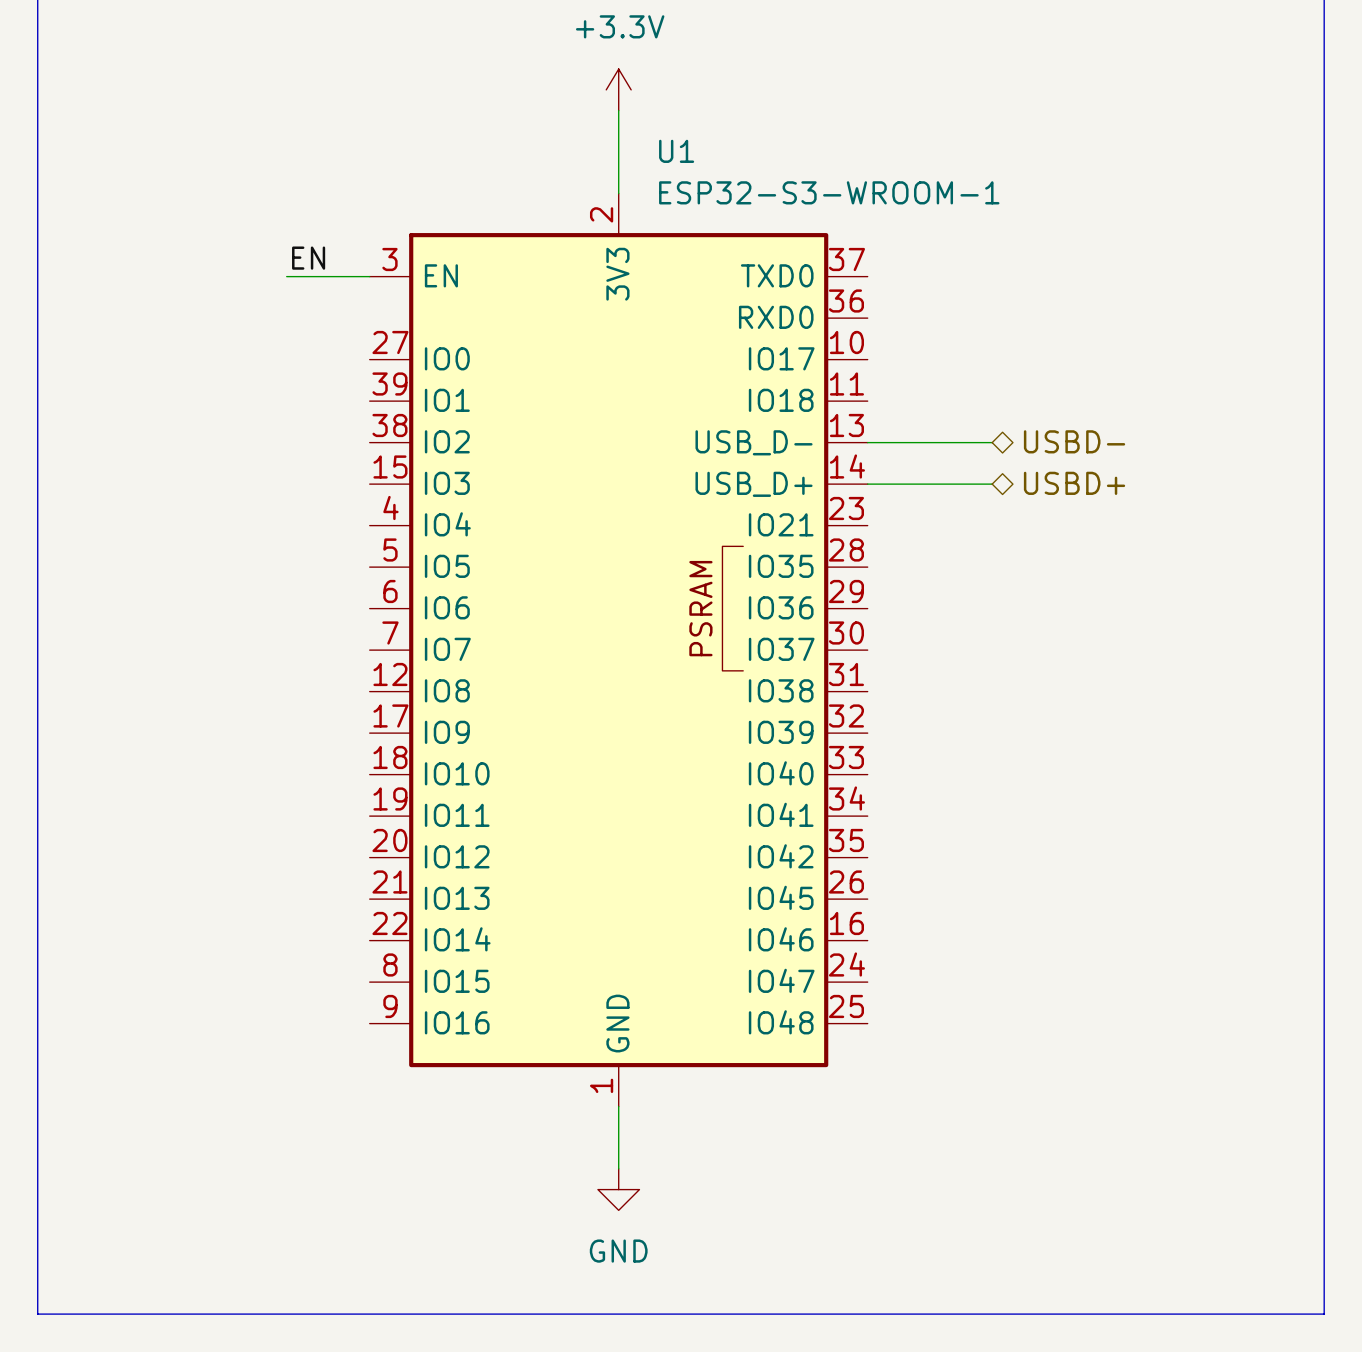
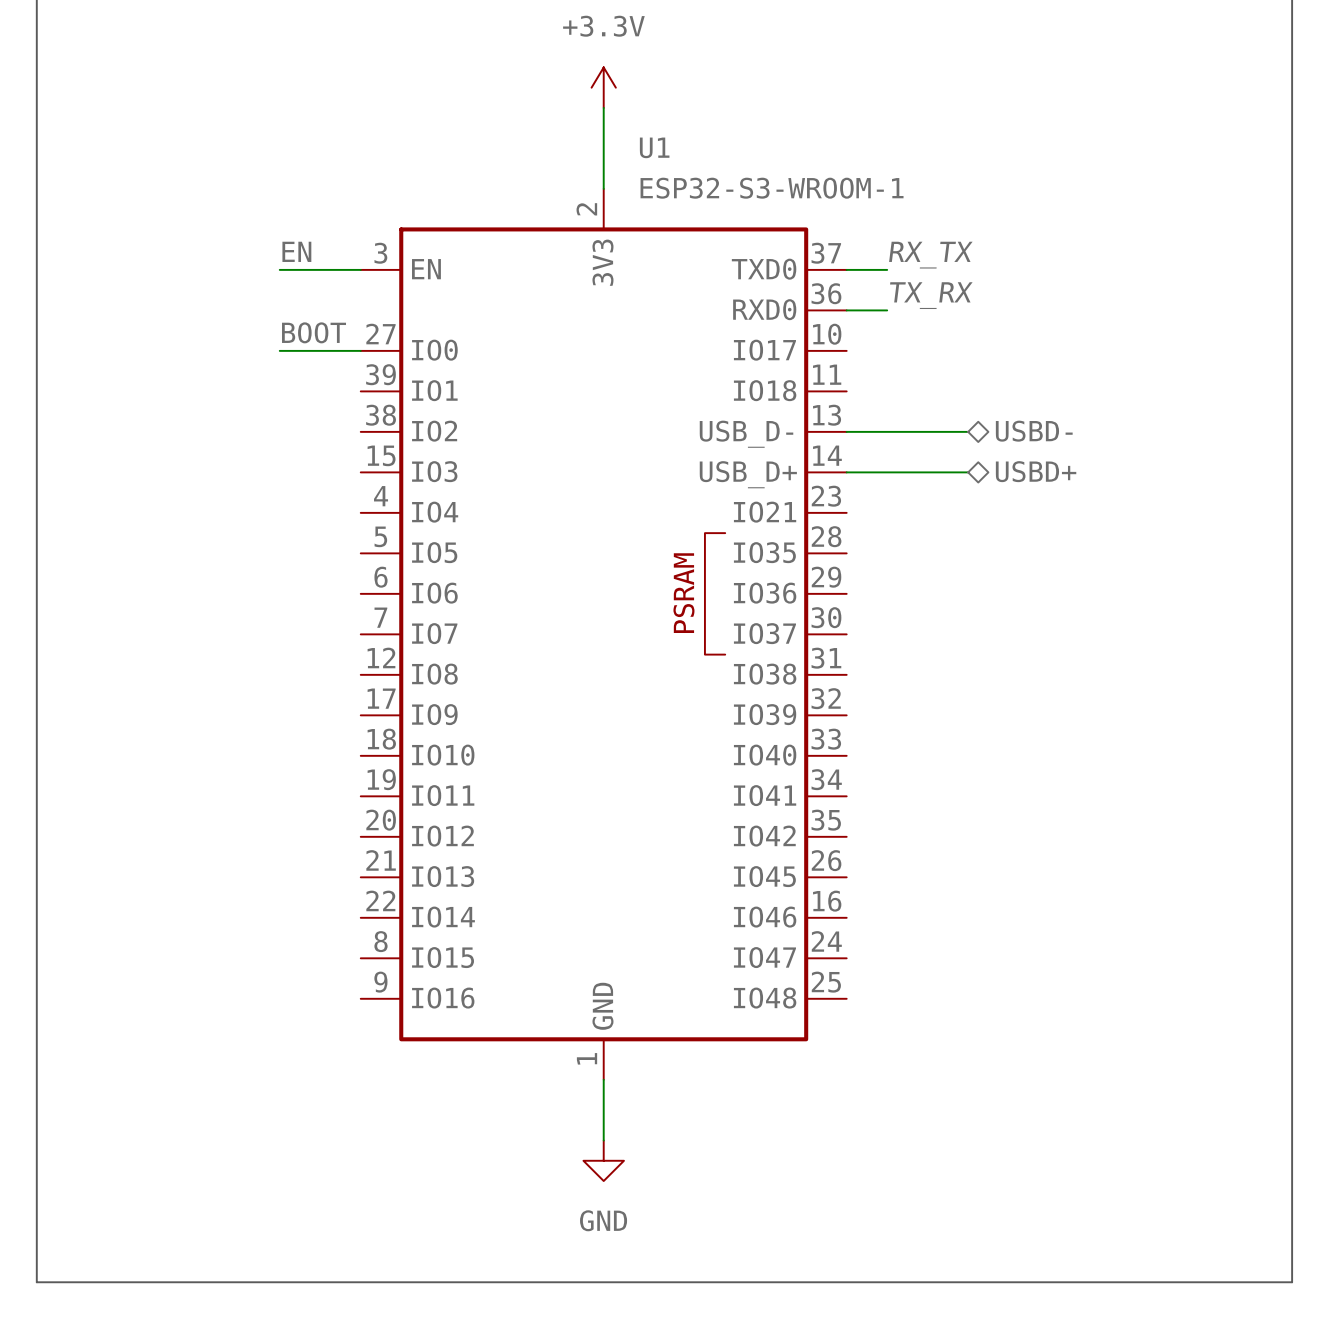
label: none -> RX_TX (930, 255)
wire: none -> (846, 269) (887, 269)
label: none -> TX_RX (931, 295)
wire: none -> (846, 310) (887, 310)
label: none -> BOOT (314, 332)
wire: none -> (279, 350) (360, 350)

